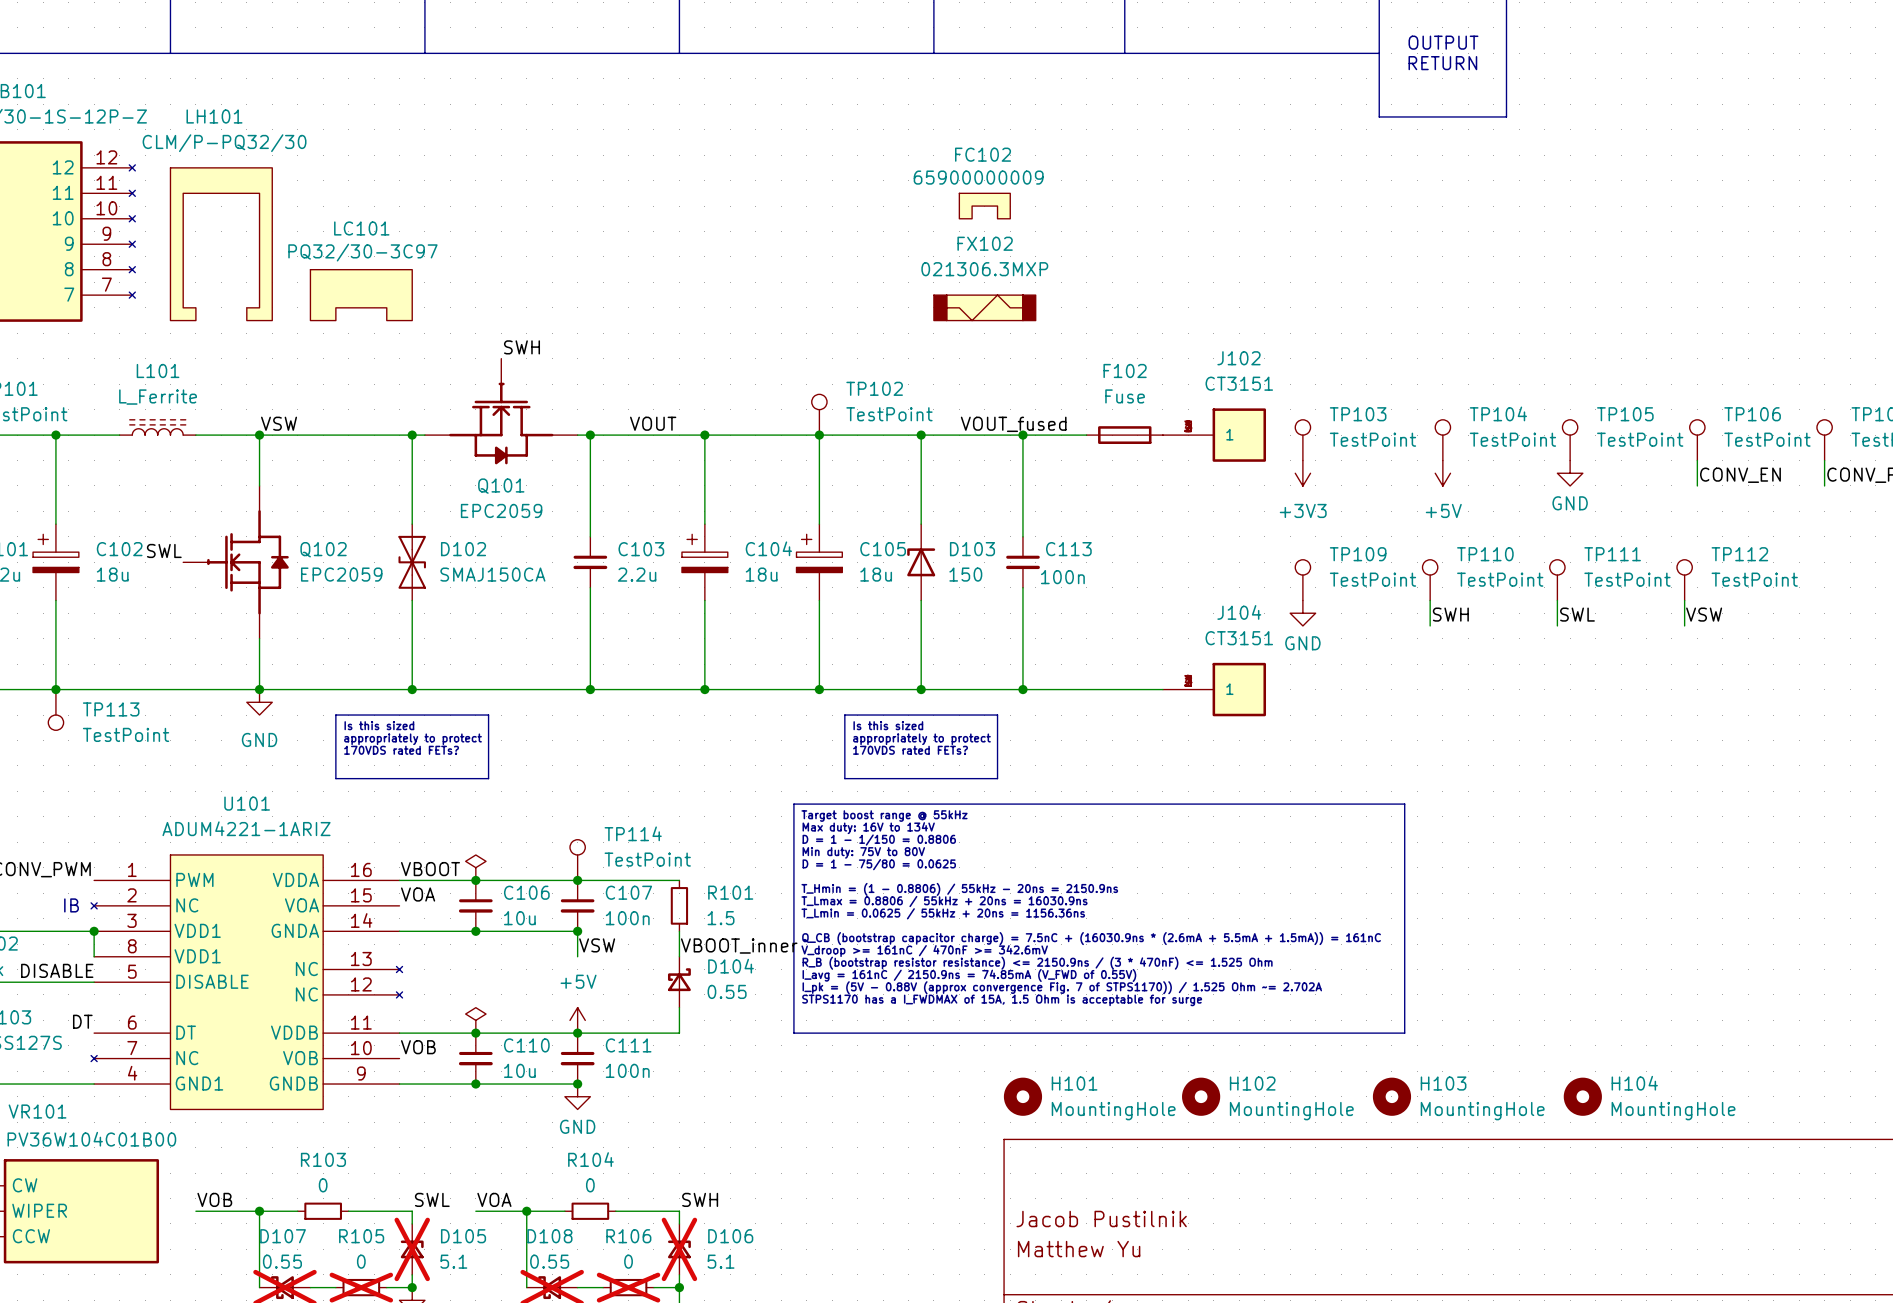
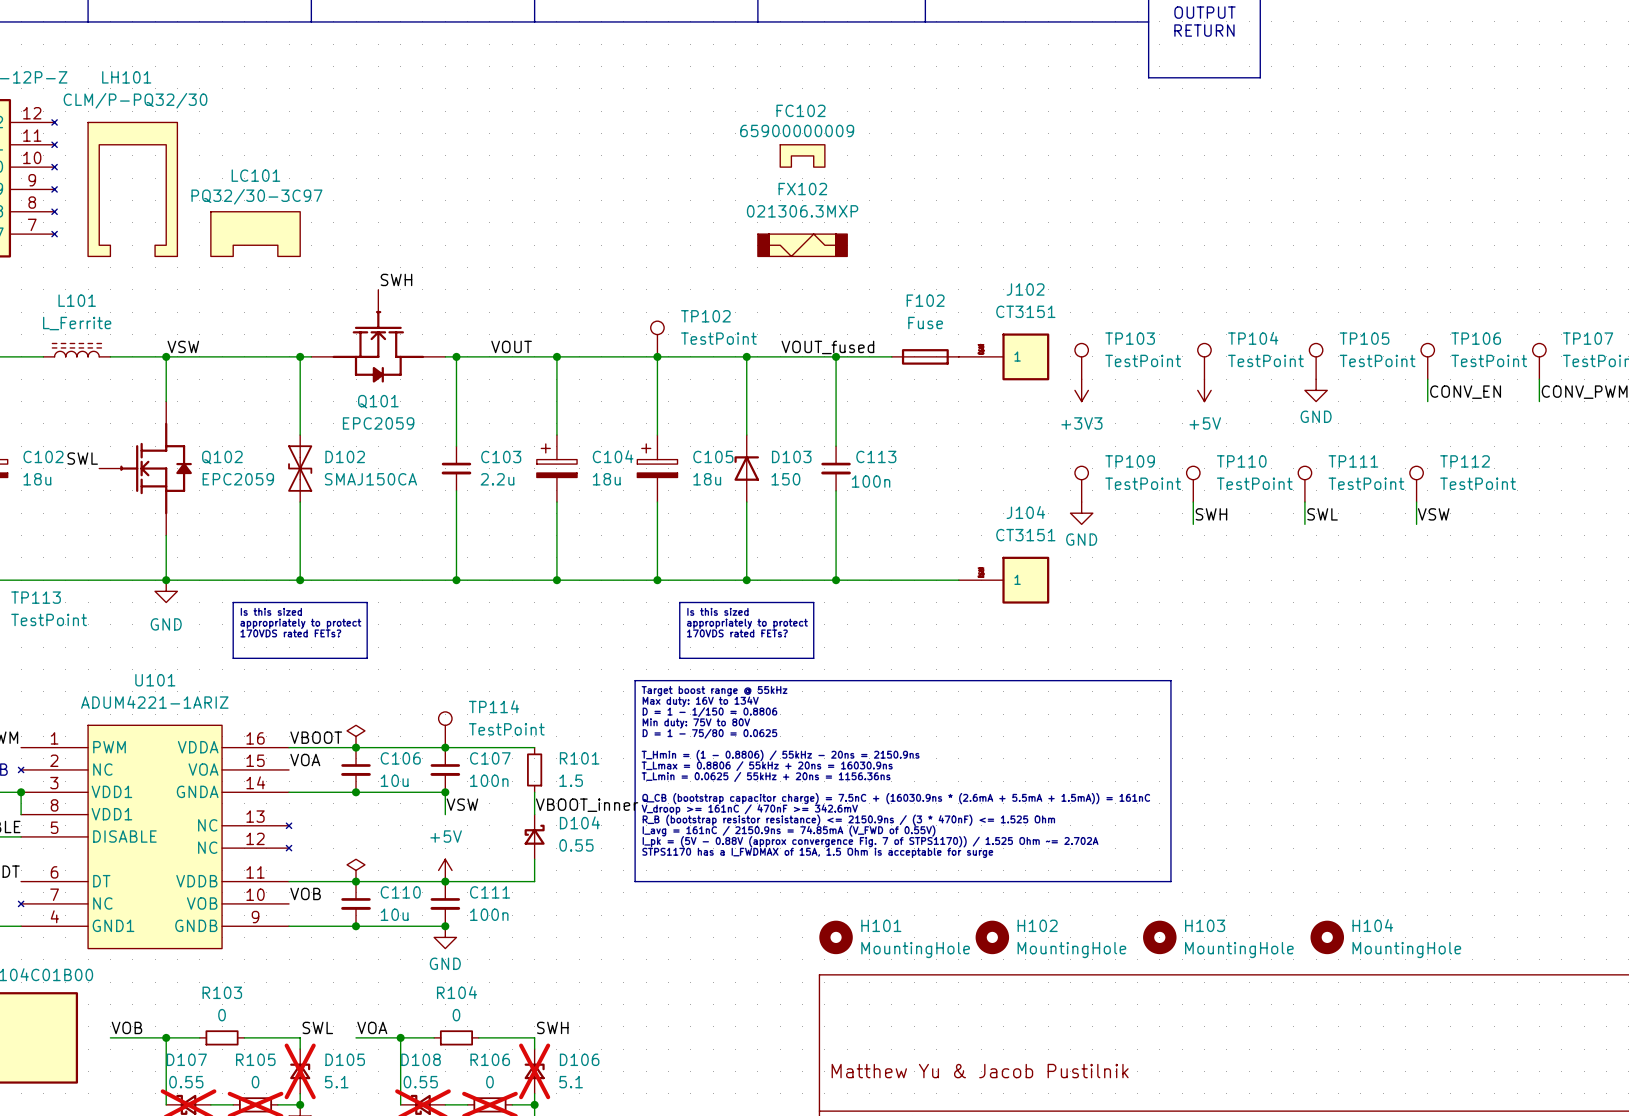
title block: Jacob Pustilnik (1101, 1219) -> none
title block: Matthew Yu (1079, 1249) -> Matthew Yu & Jacob Pustilnik (980, 1071)

